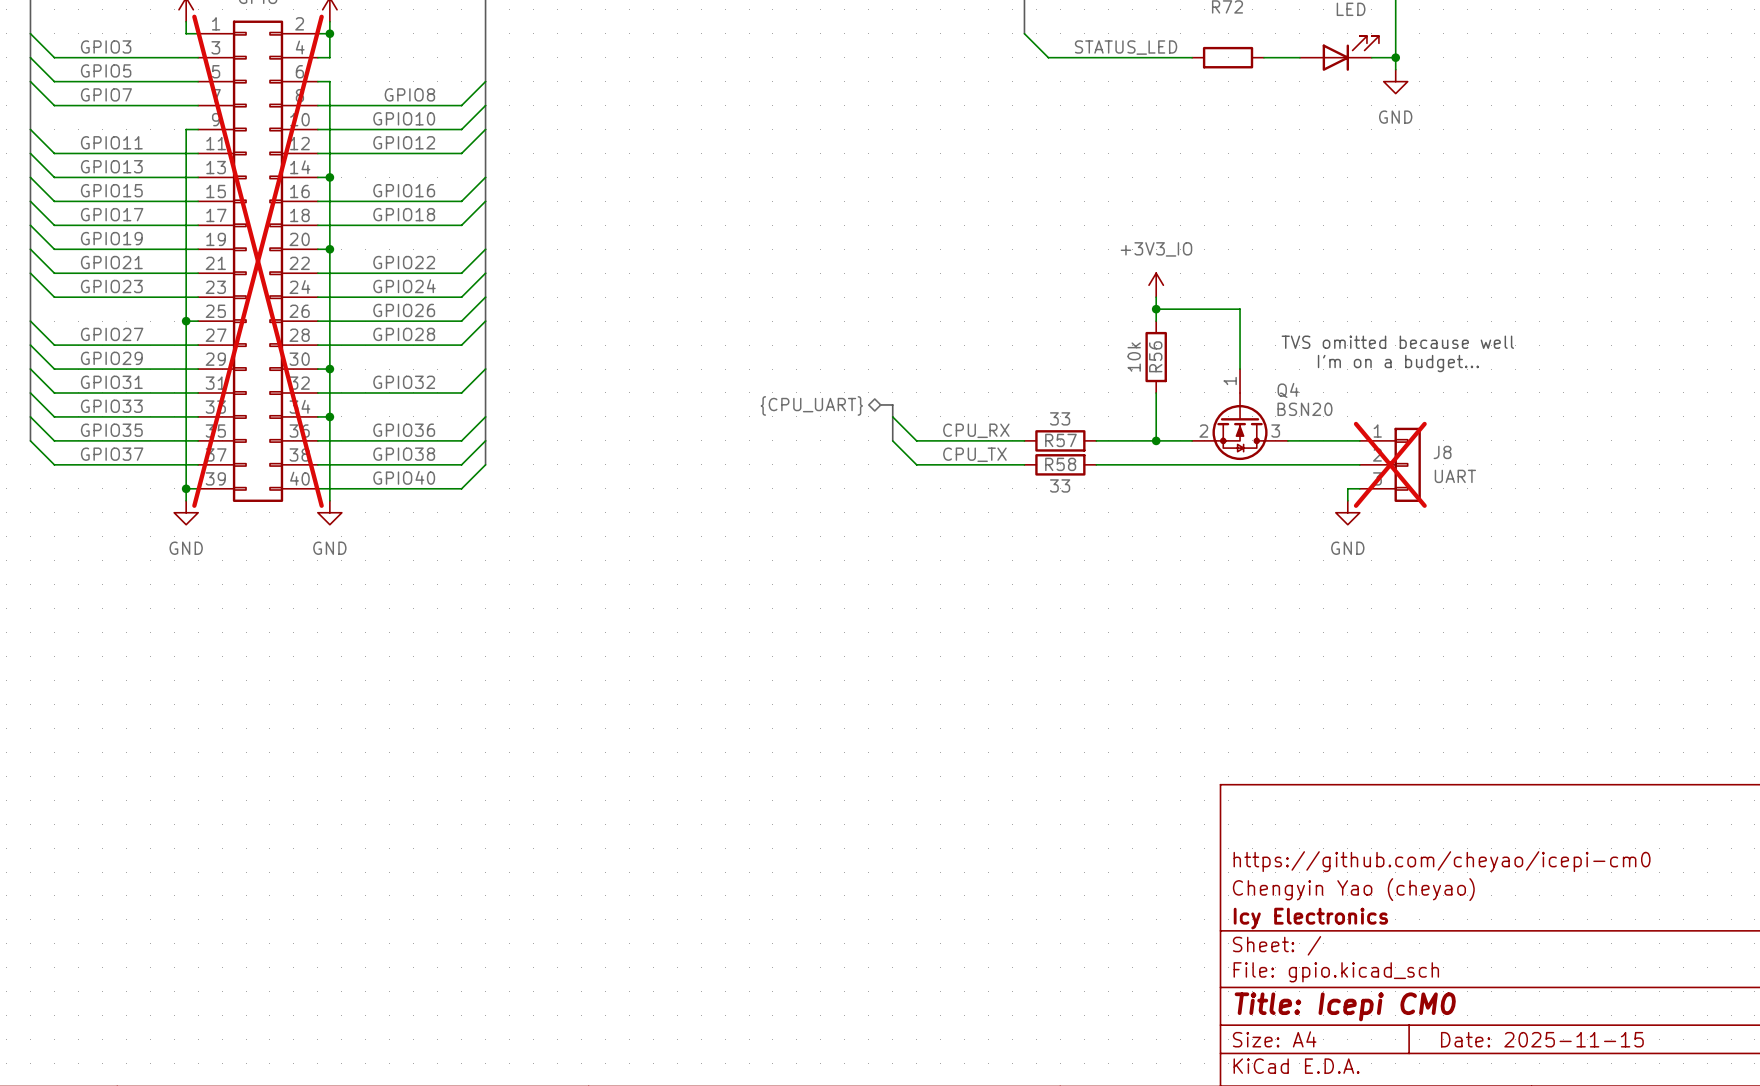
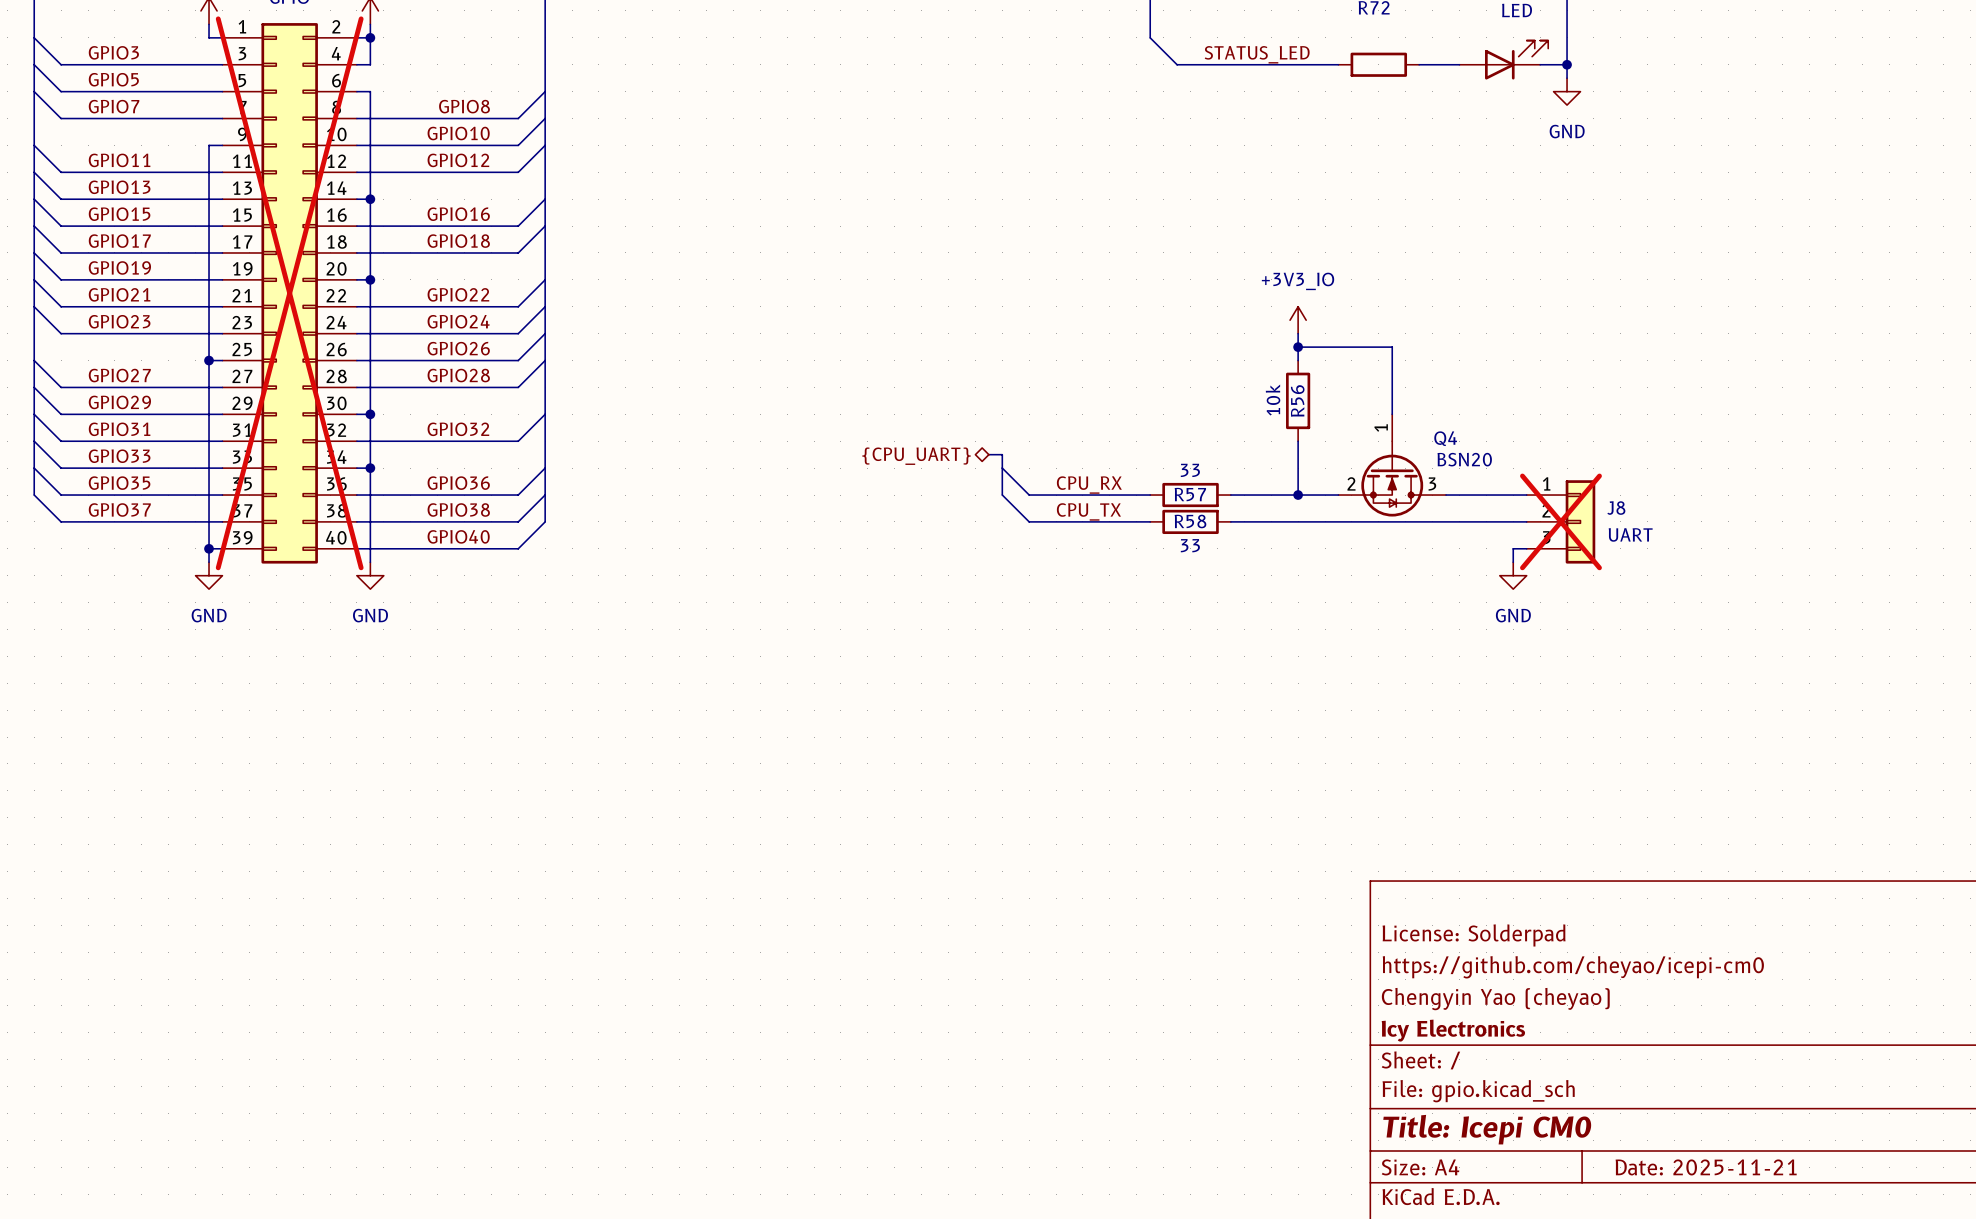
text: TVS omitted because well (1397, 342) -> none
text: I'm on a budget... (1398, 363) -> none
title block: none -> License: Solderpad (1474, 935)
title block: Date: 2025-11-15 (1542, 1039) -> Date: 2025-11-21 (1706, 1167)

